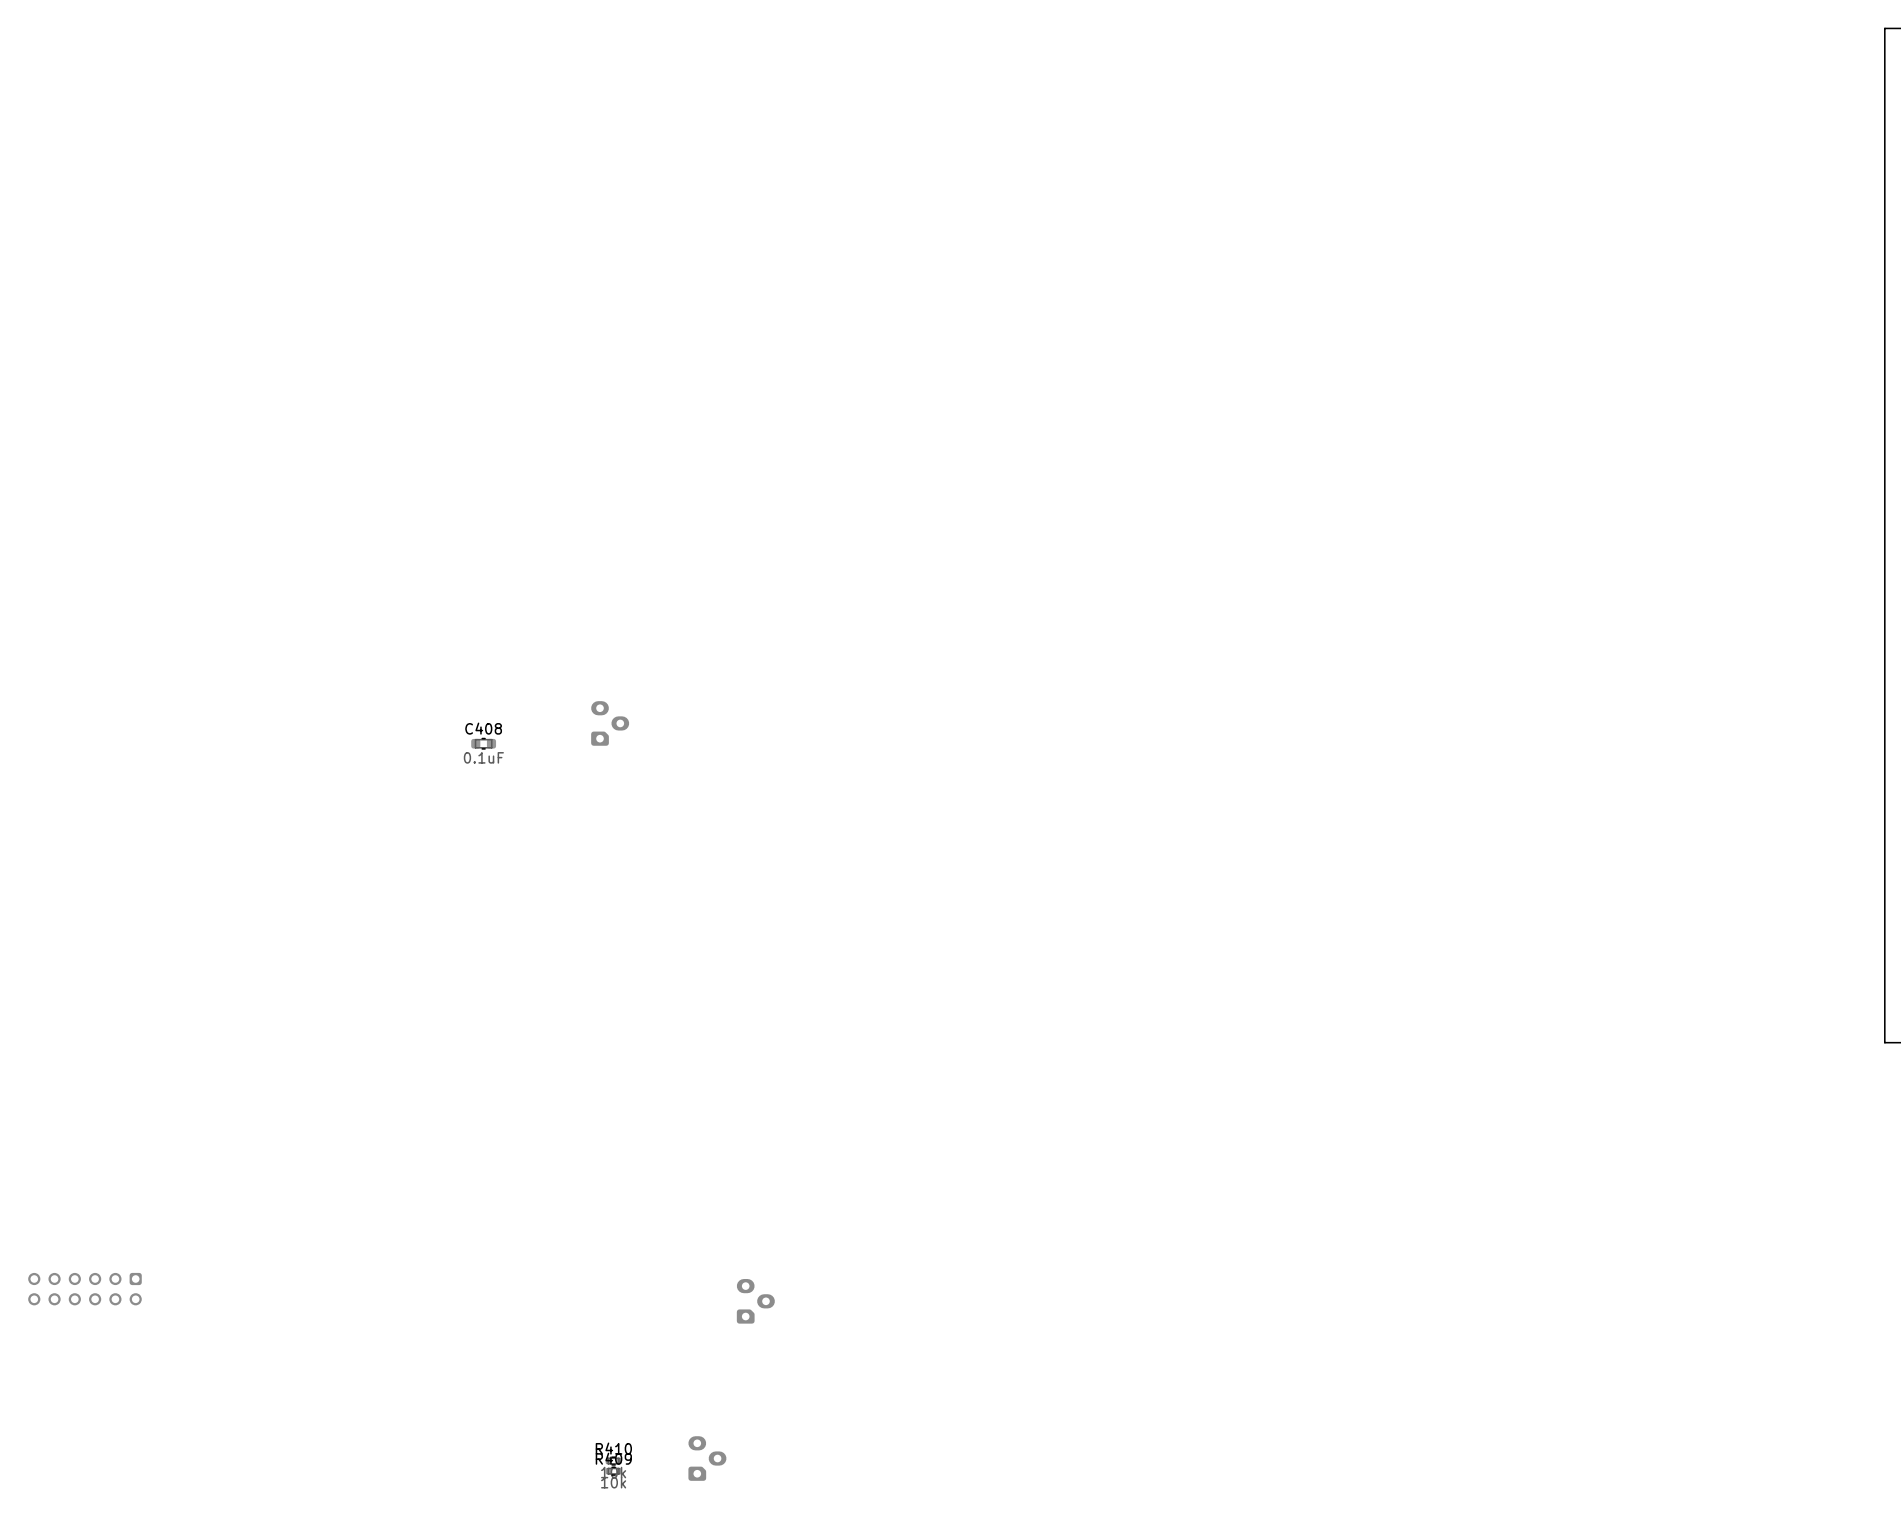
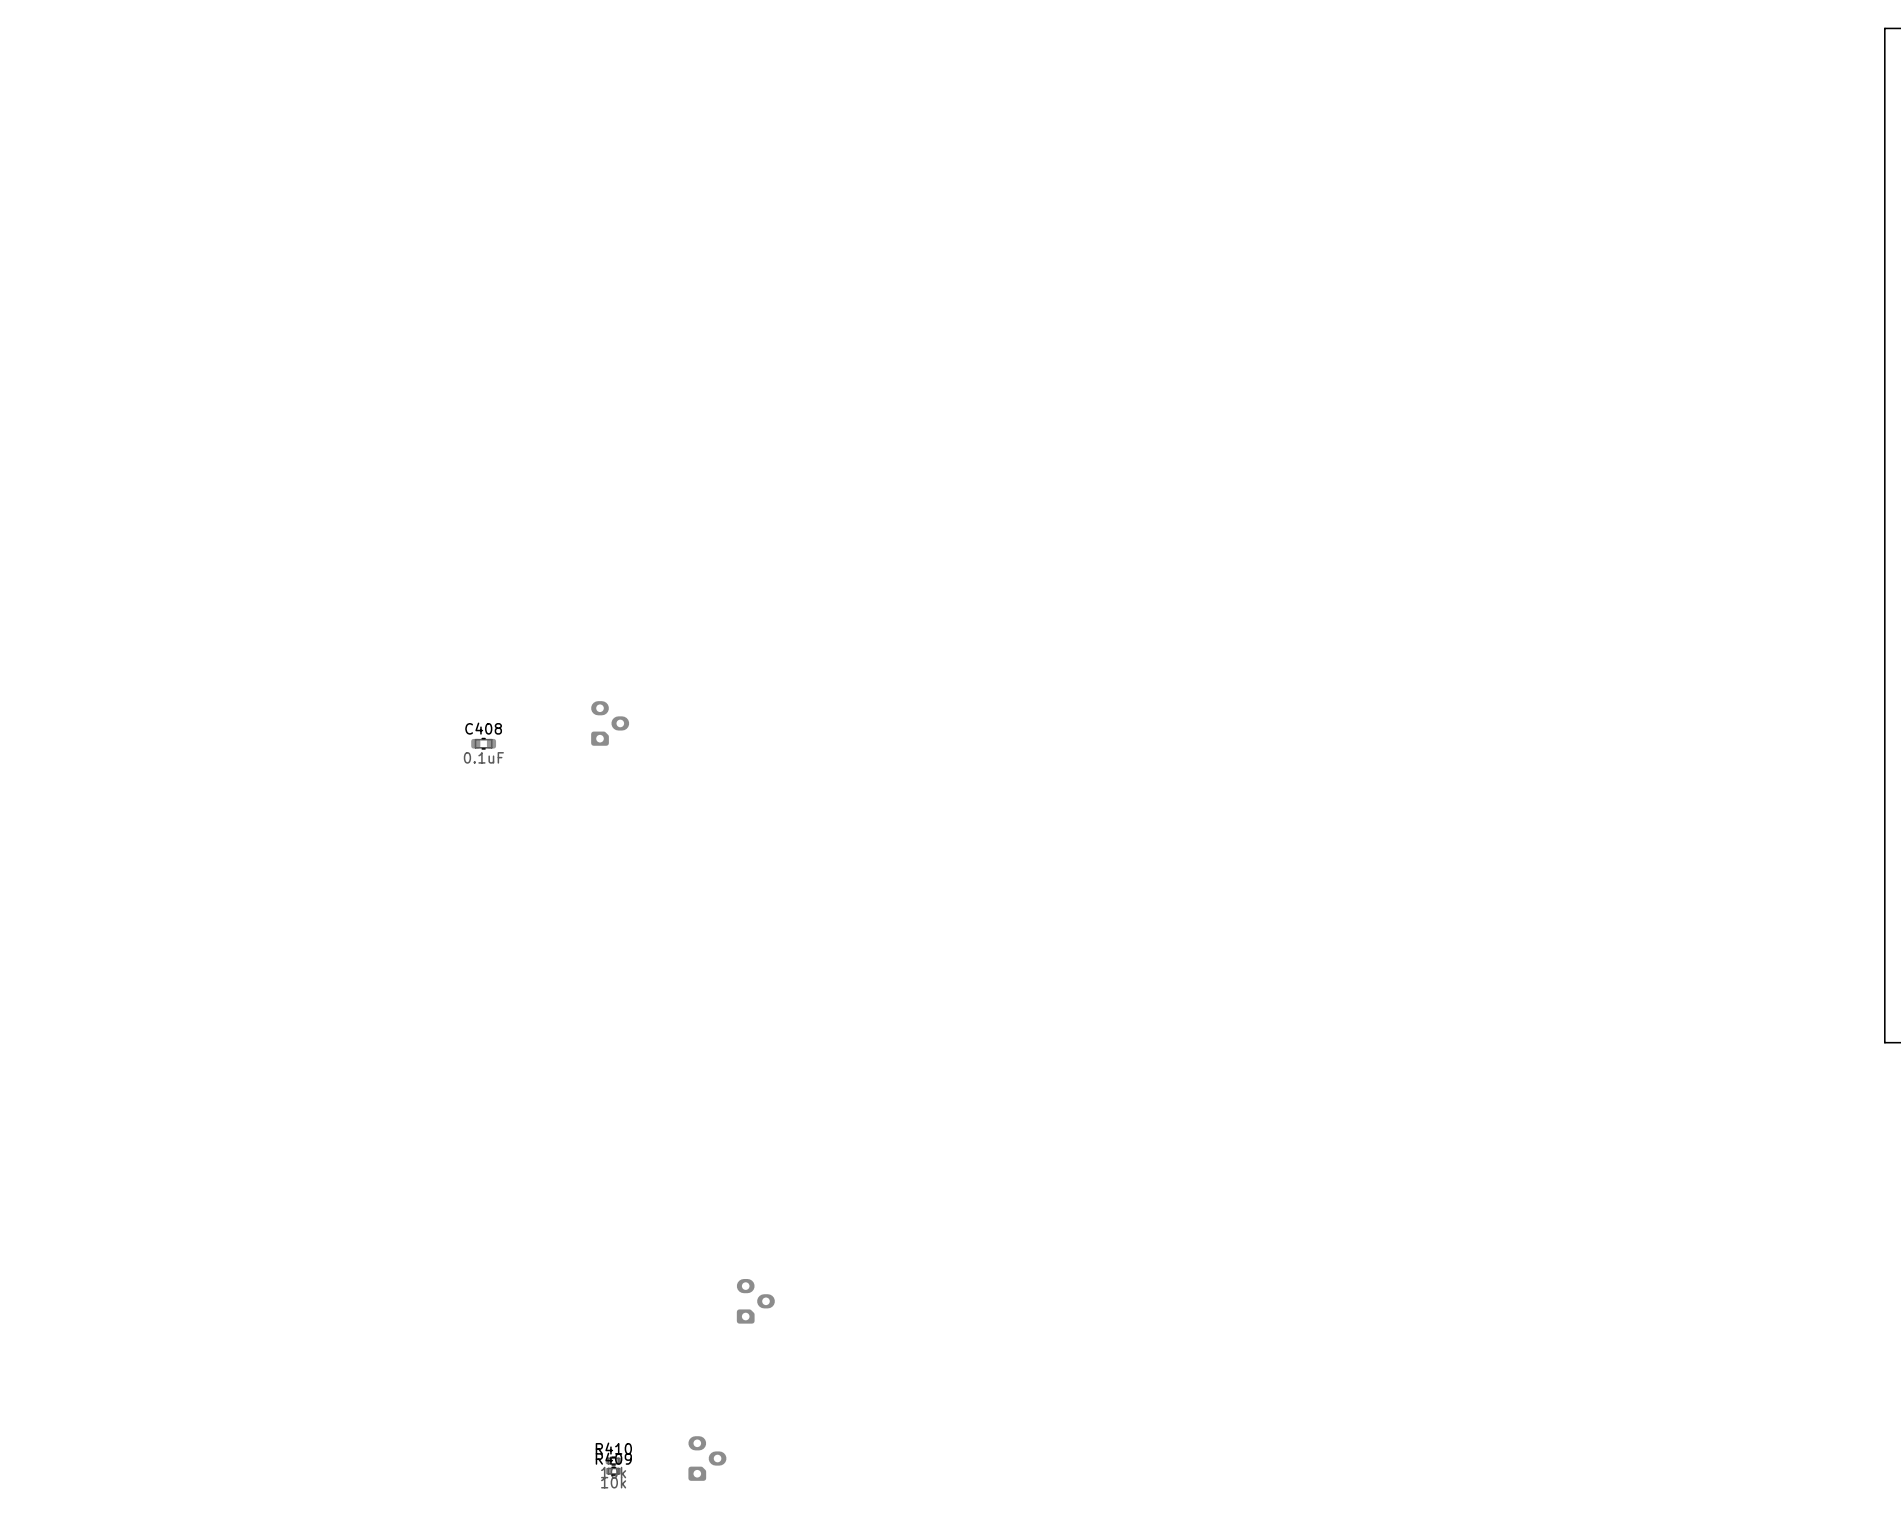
part: (84, 1289) -> none

